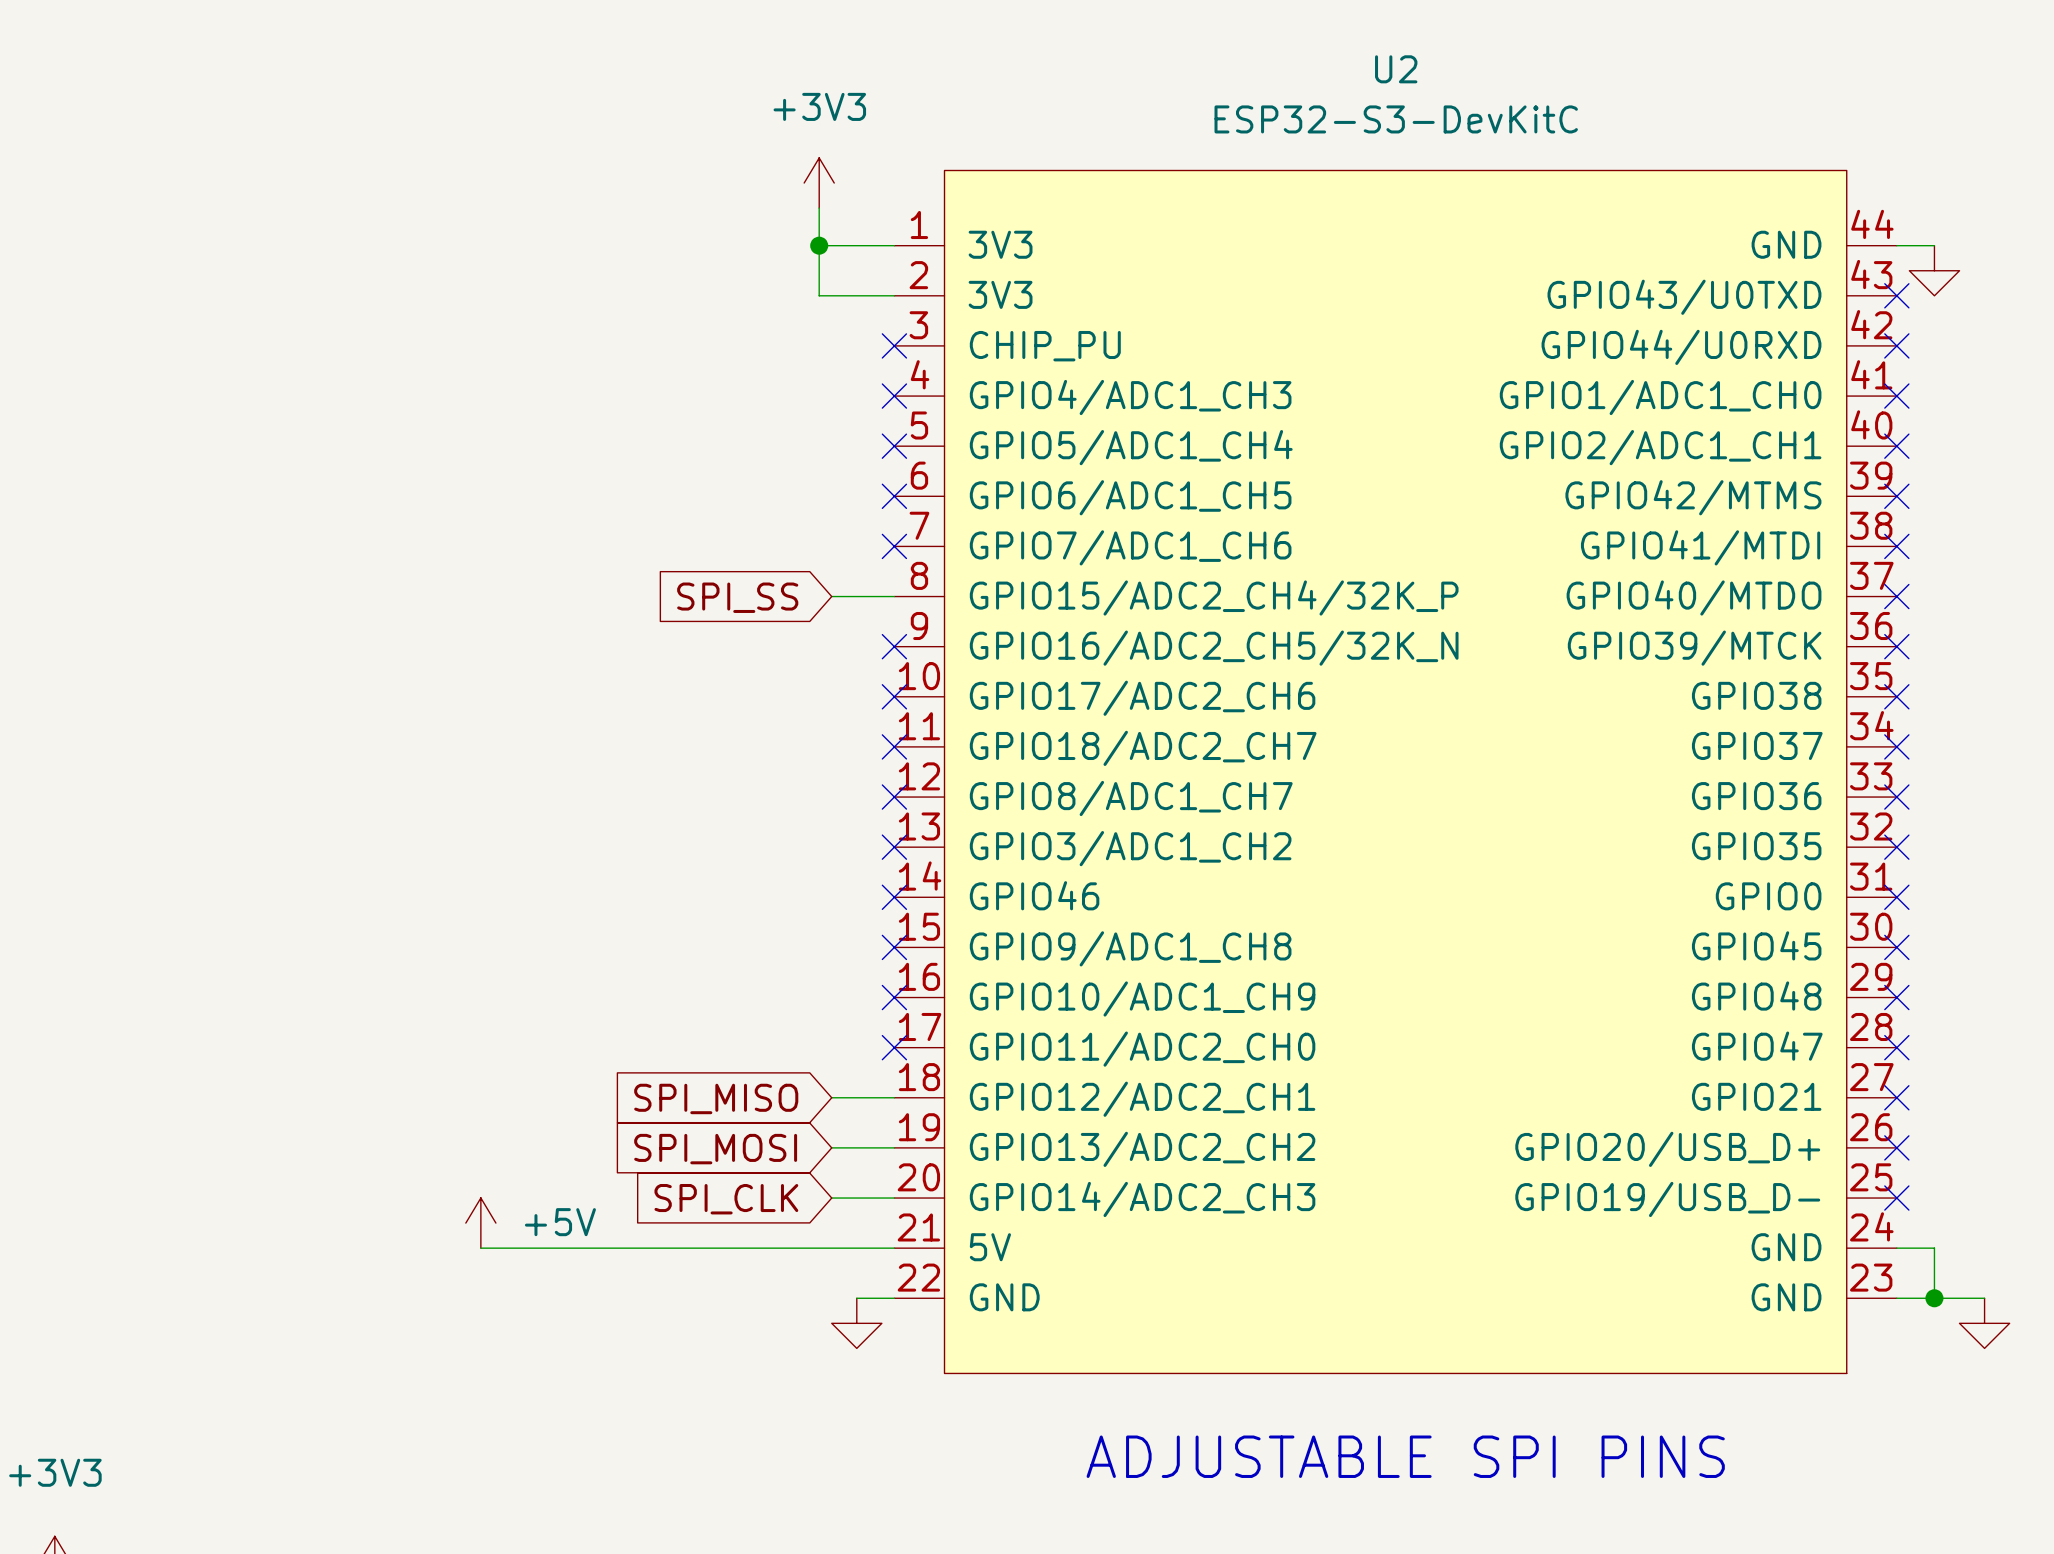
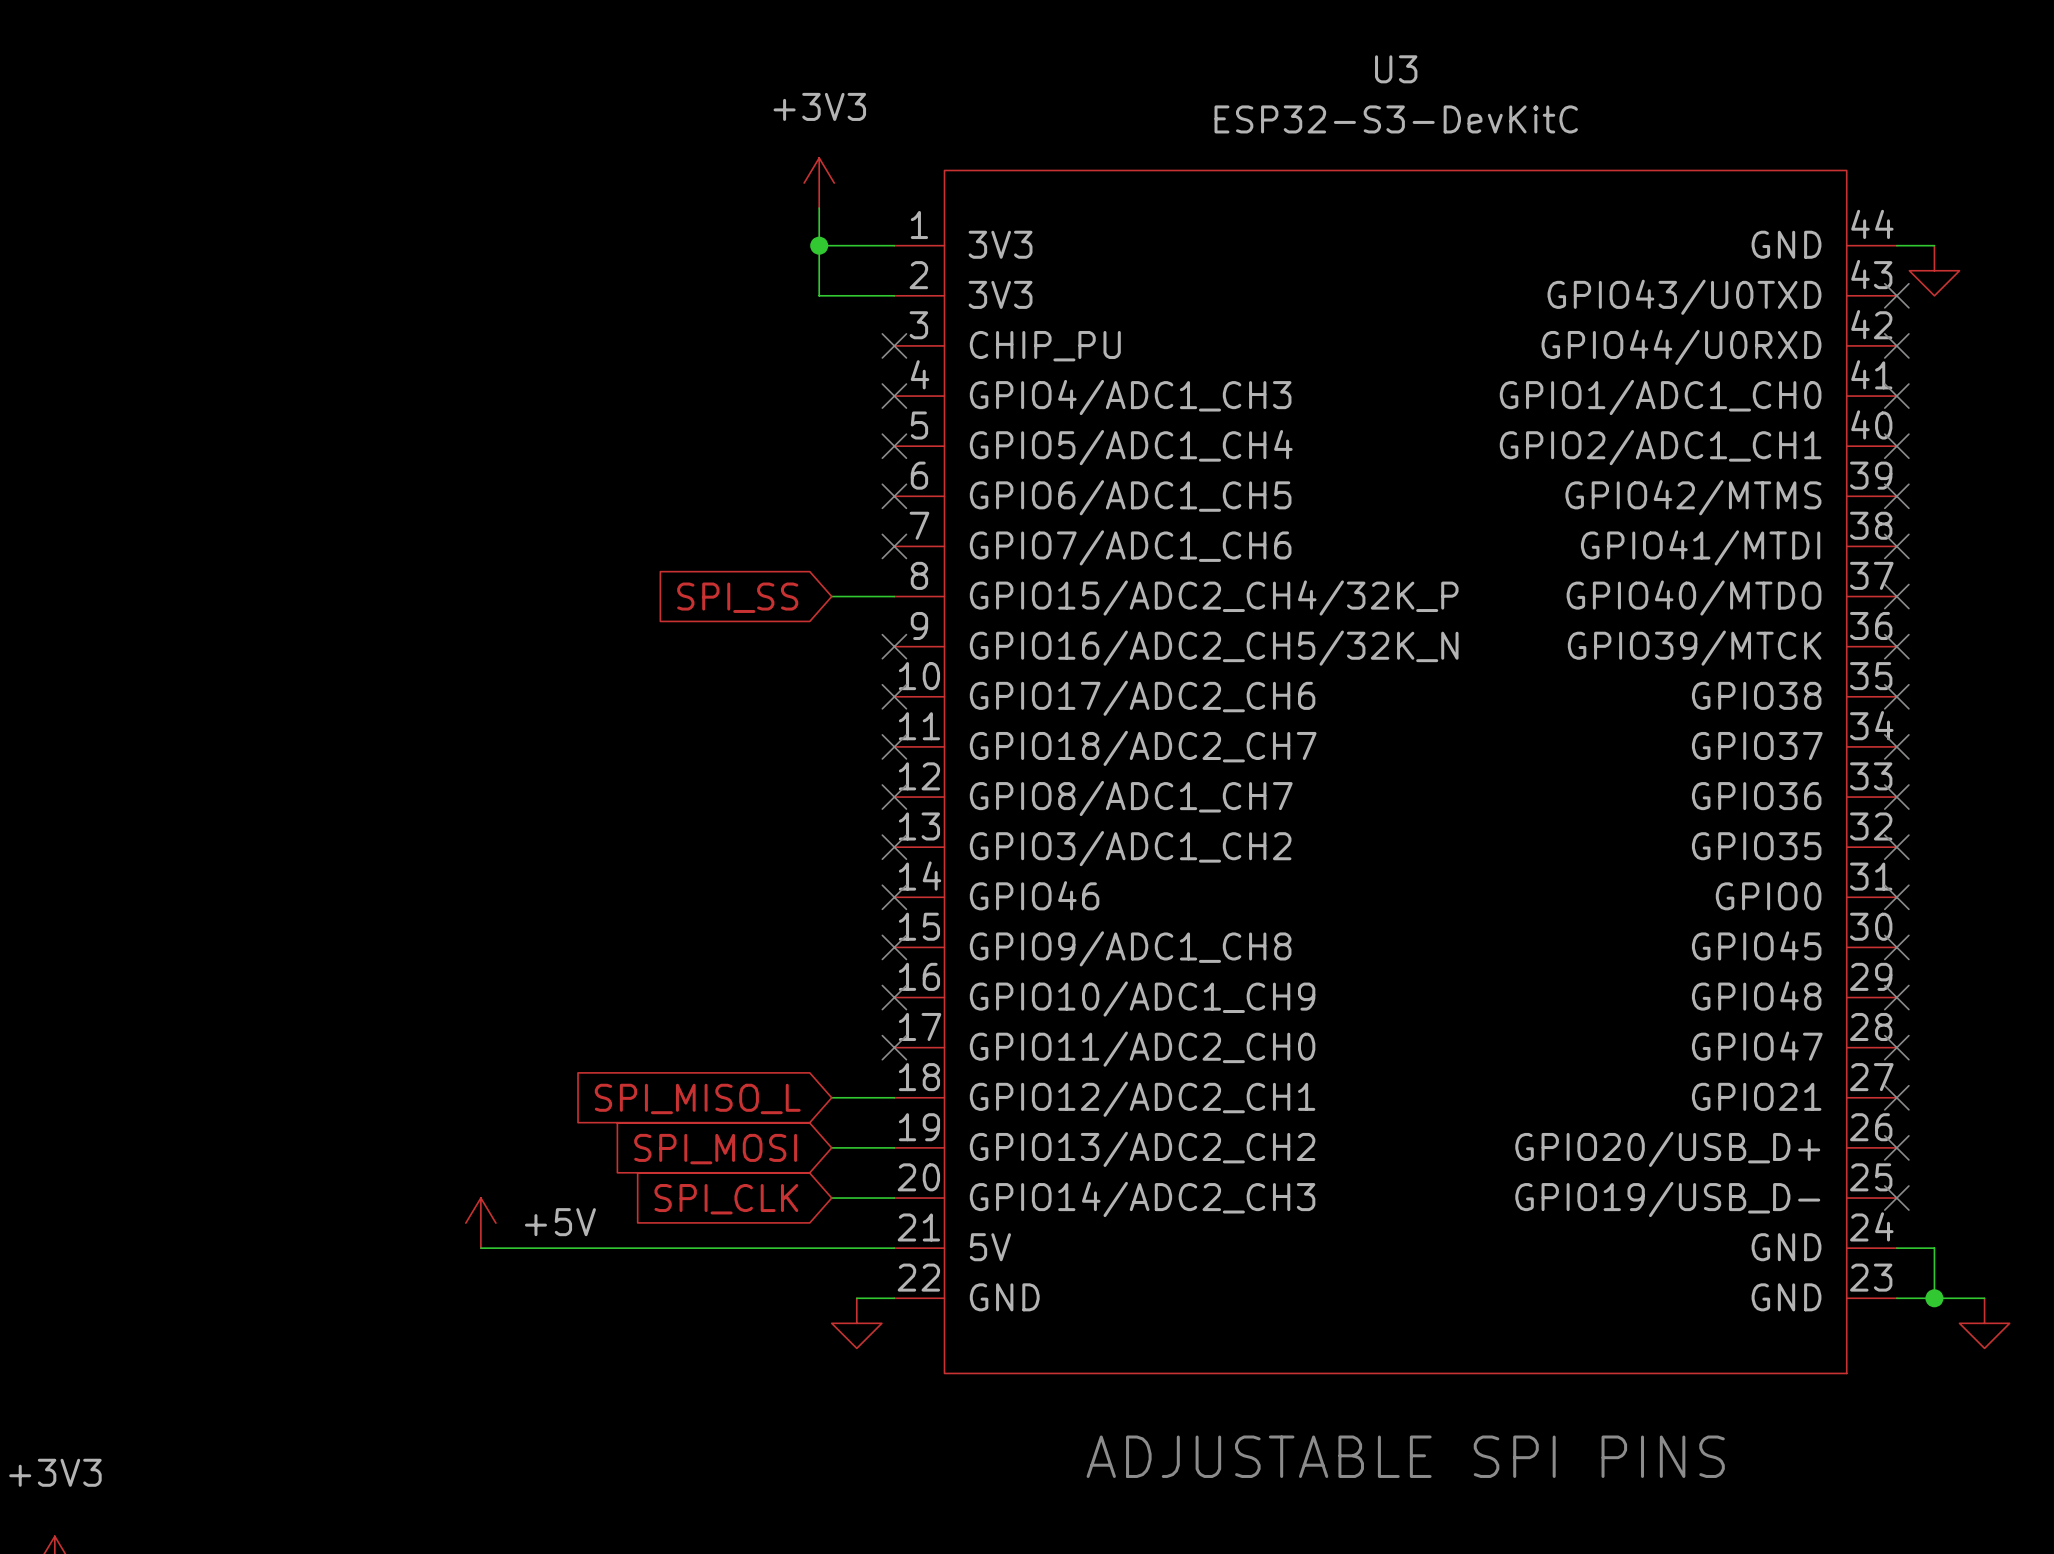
U2 name: U2 (1396, 69) -> U3 (1396, 69)
global label: SPI_MISO (716, 1098) -> SPI_MISO_L (697, 1098)

